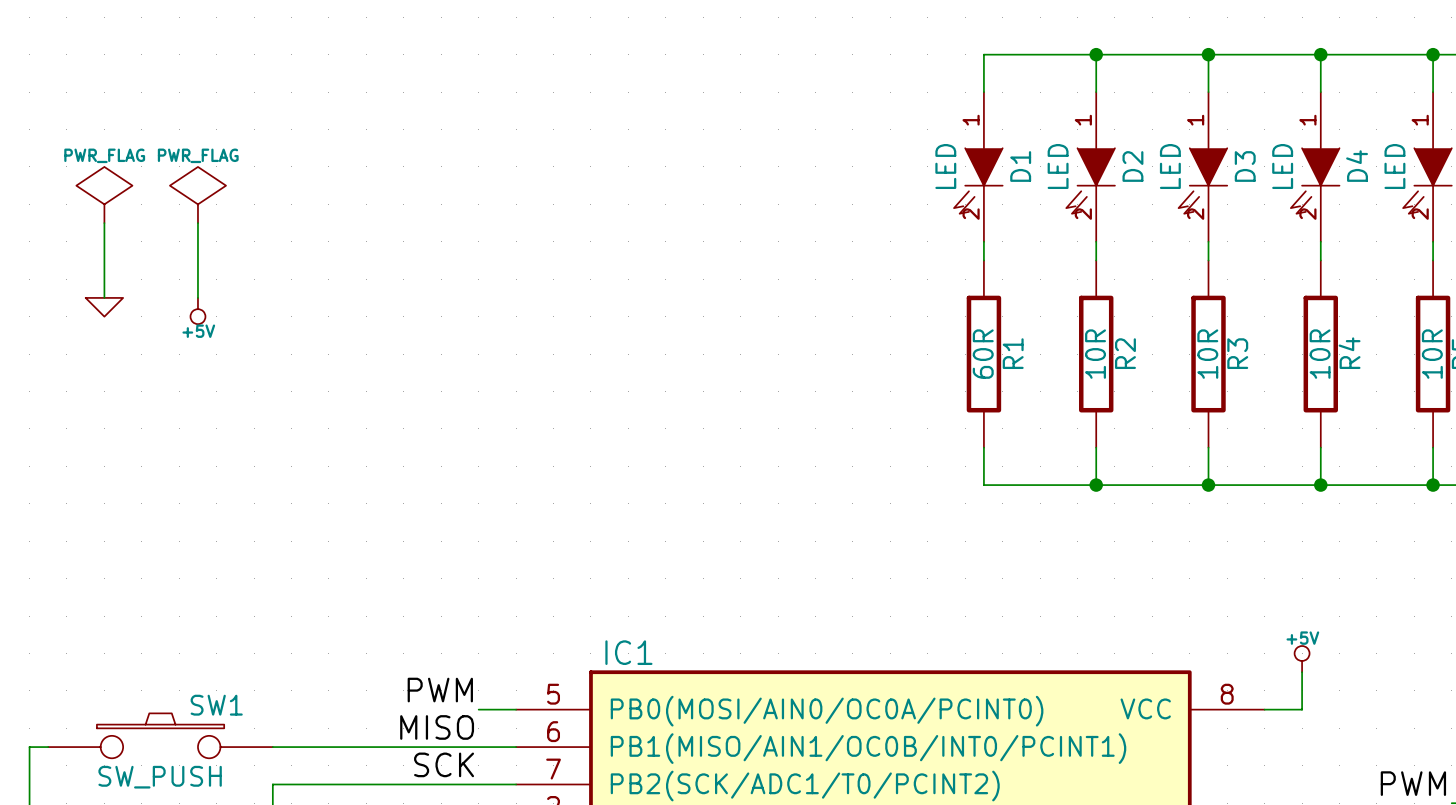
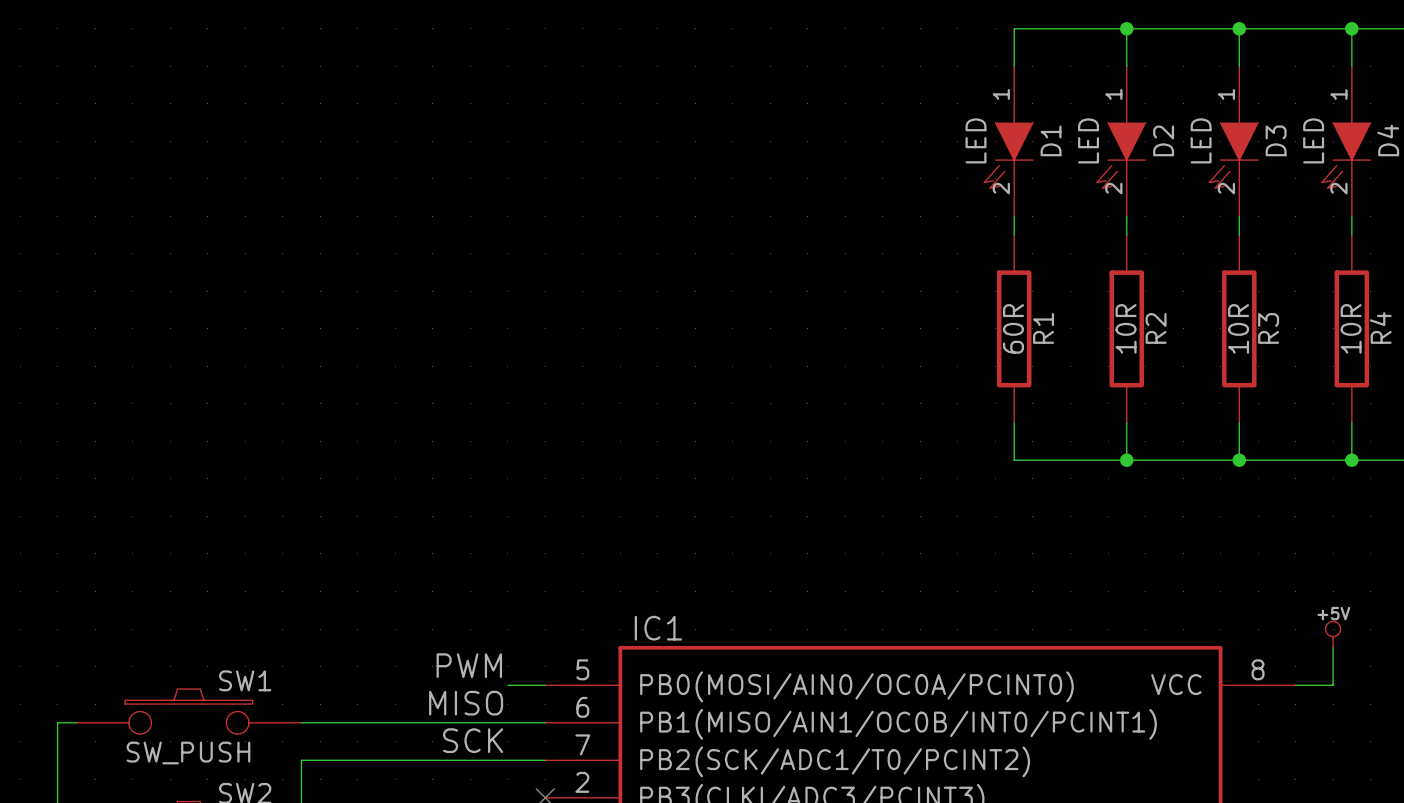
power symbol: PWR_FLAG (104, 195) -> none
power symbol: PWR_FLAG (197, 195) -> none
wire: (104, 223) (104, 297) -> none
wire: (197, 223) (197, 297) -> none
power symbol: (104, 307) -> none
power symbol: +5V (197, 311) -> none

